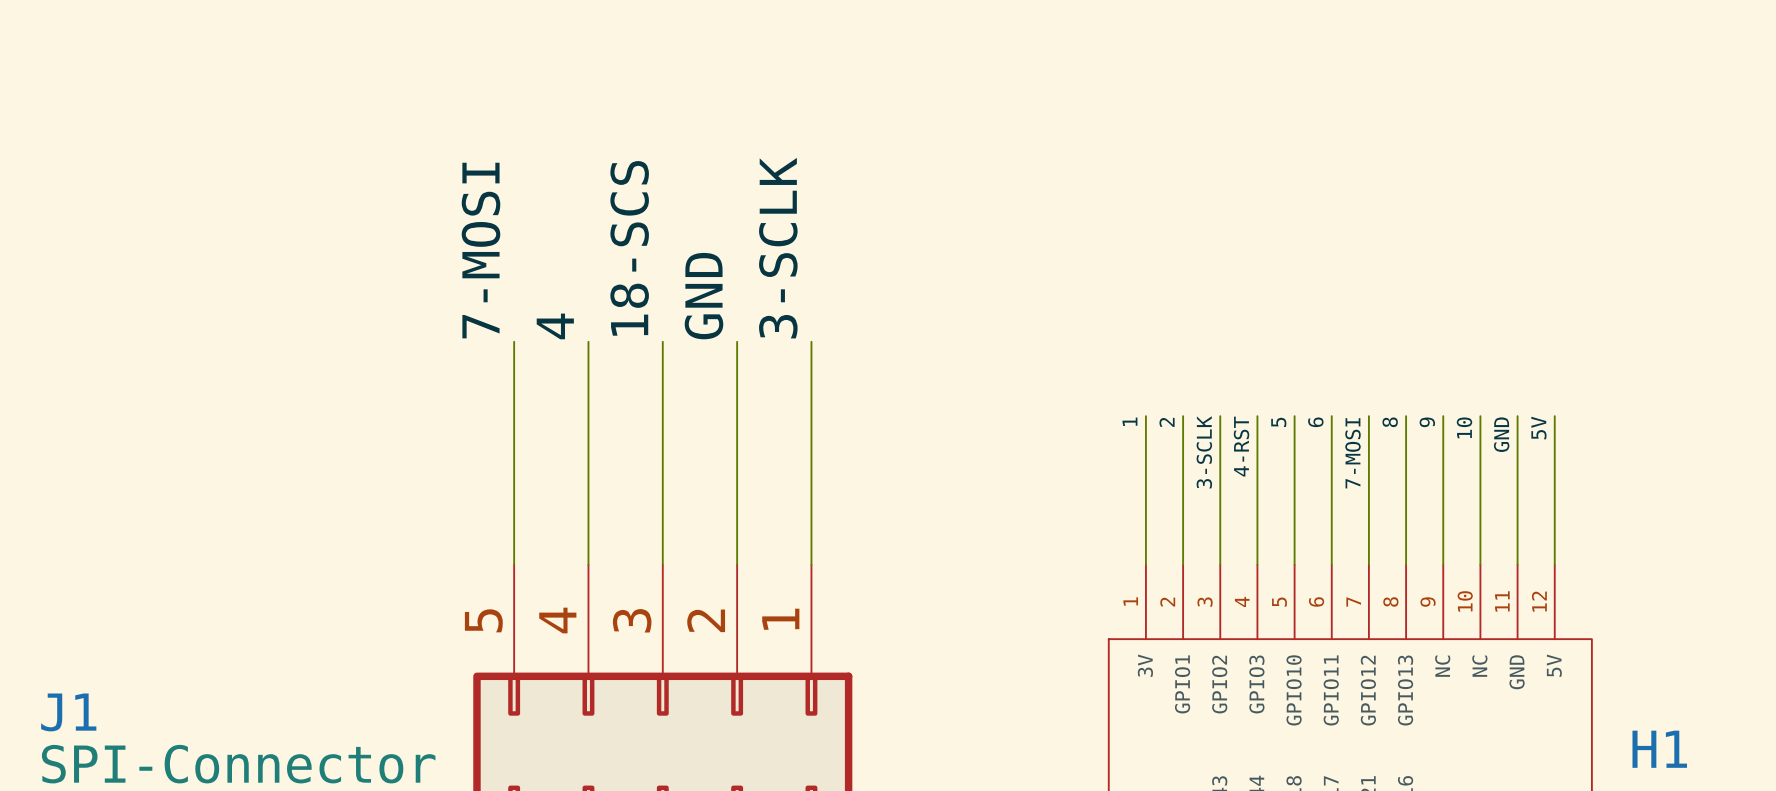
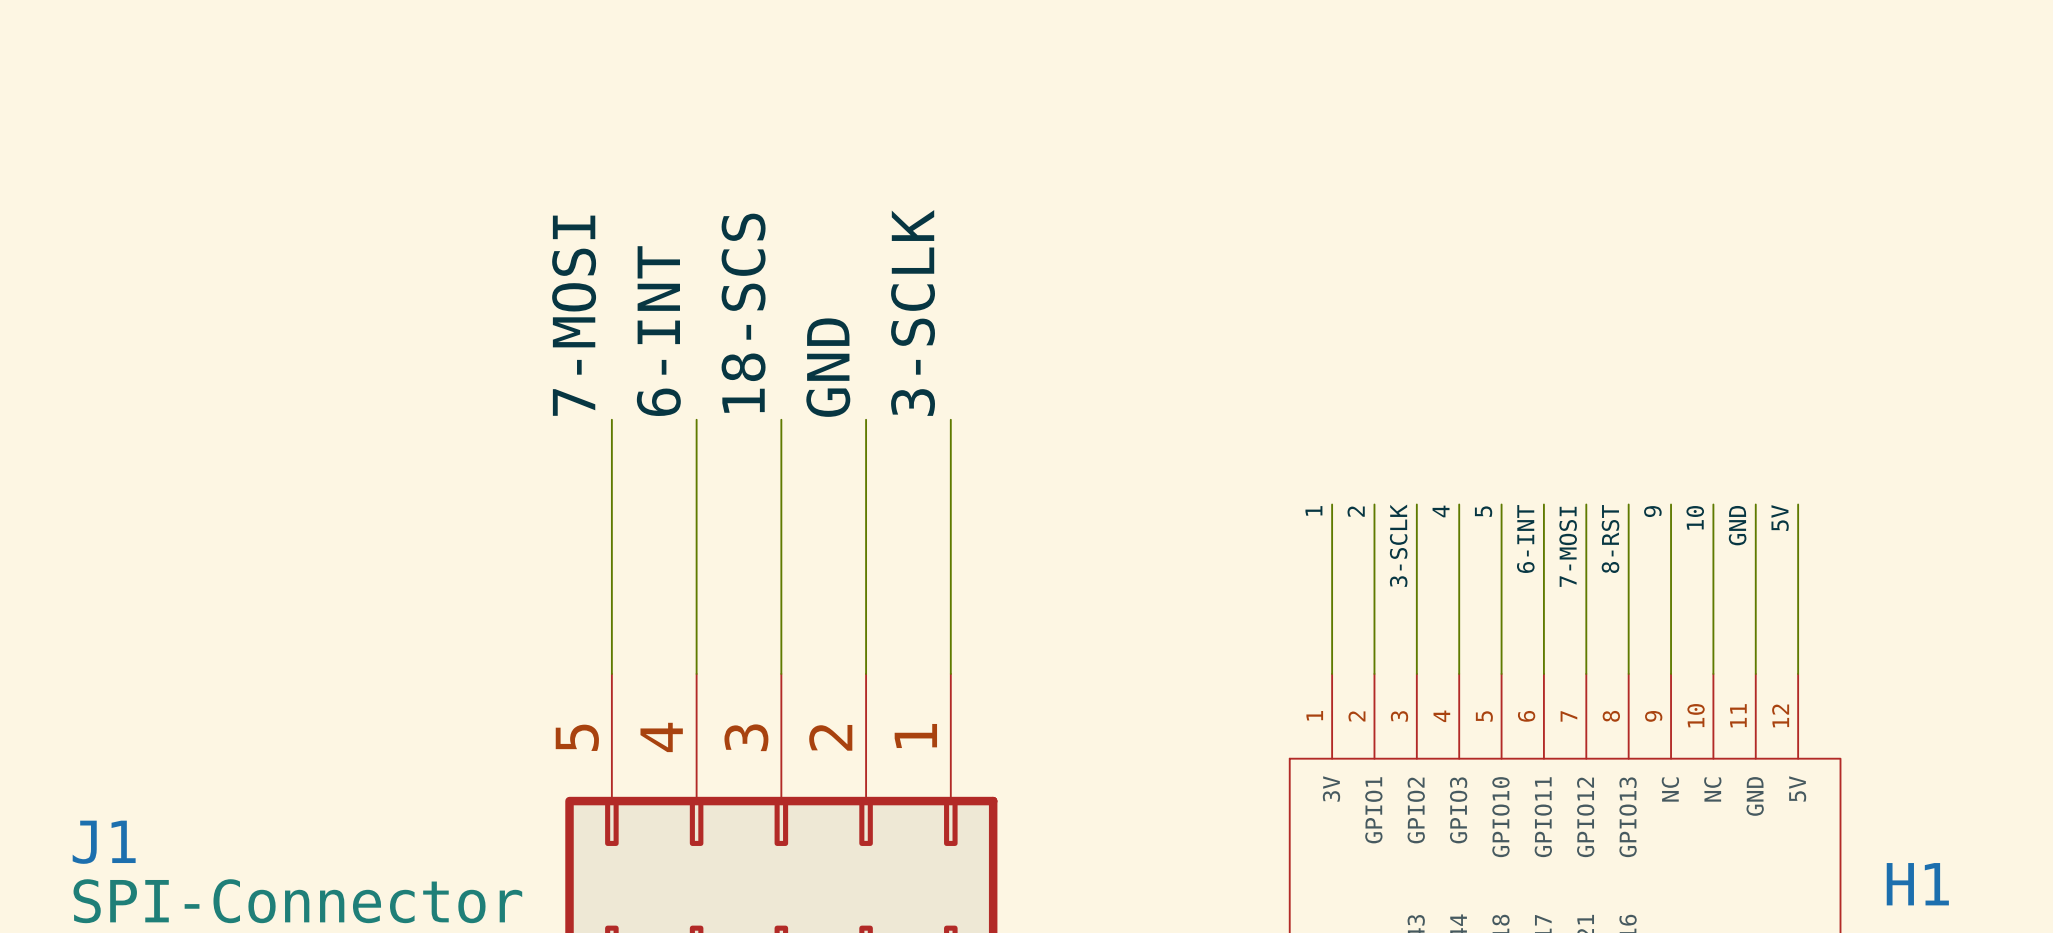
label: 4 (555, 326) -> 6-INT (658, 331)
label: 6 (1315, 422) -> 6-INT (1525, 539)
label: 8 (1390, 422) -> 8-RST (1610, 539)
label: 4-RST (1241, 446) -> 4 (1441, 511)

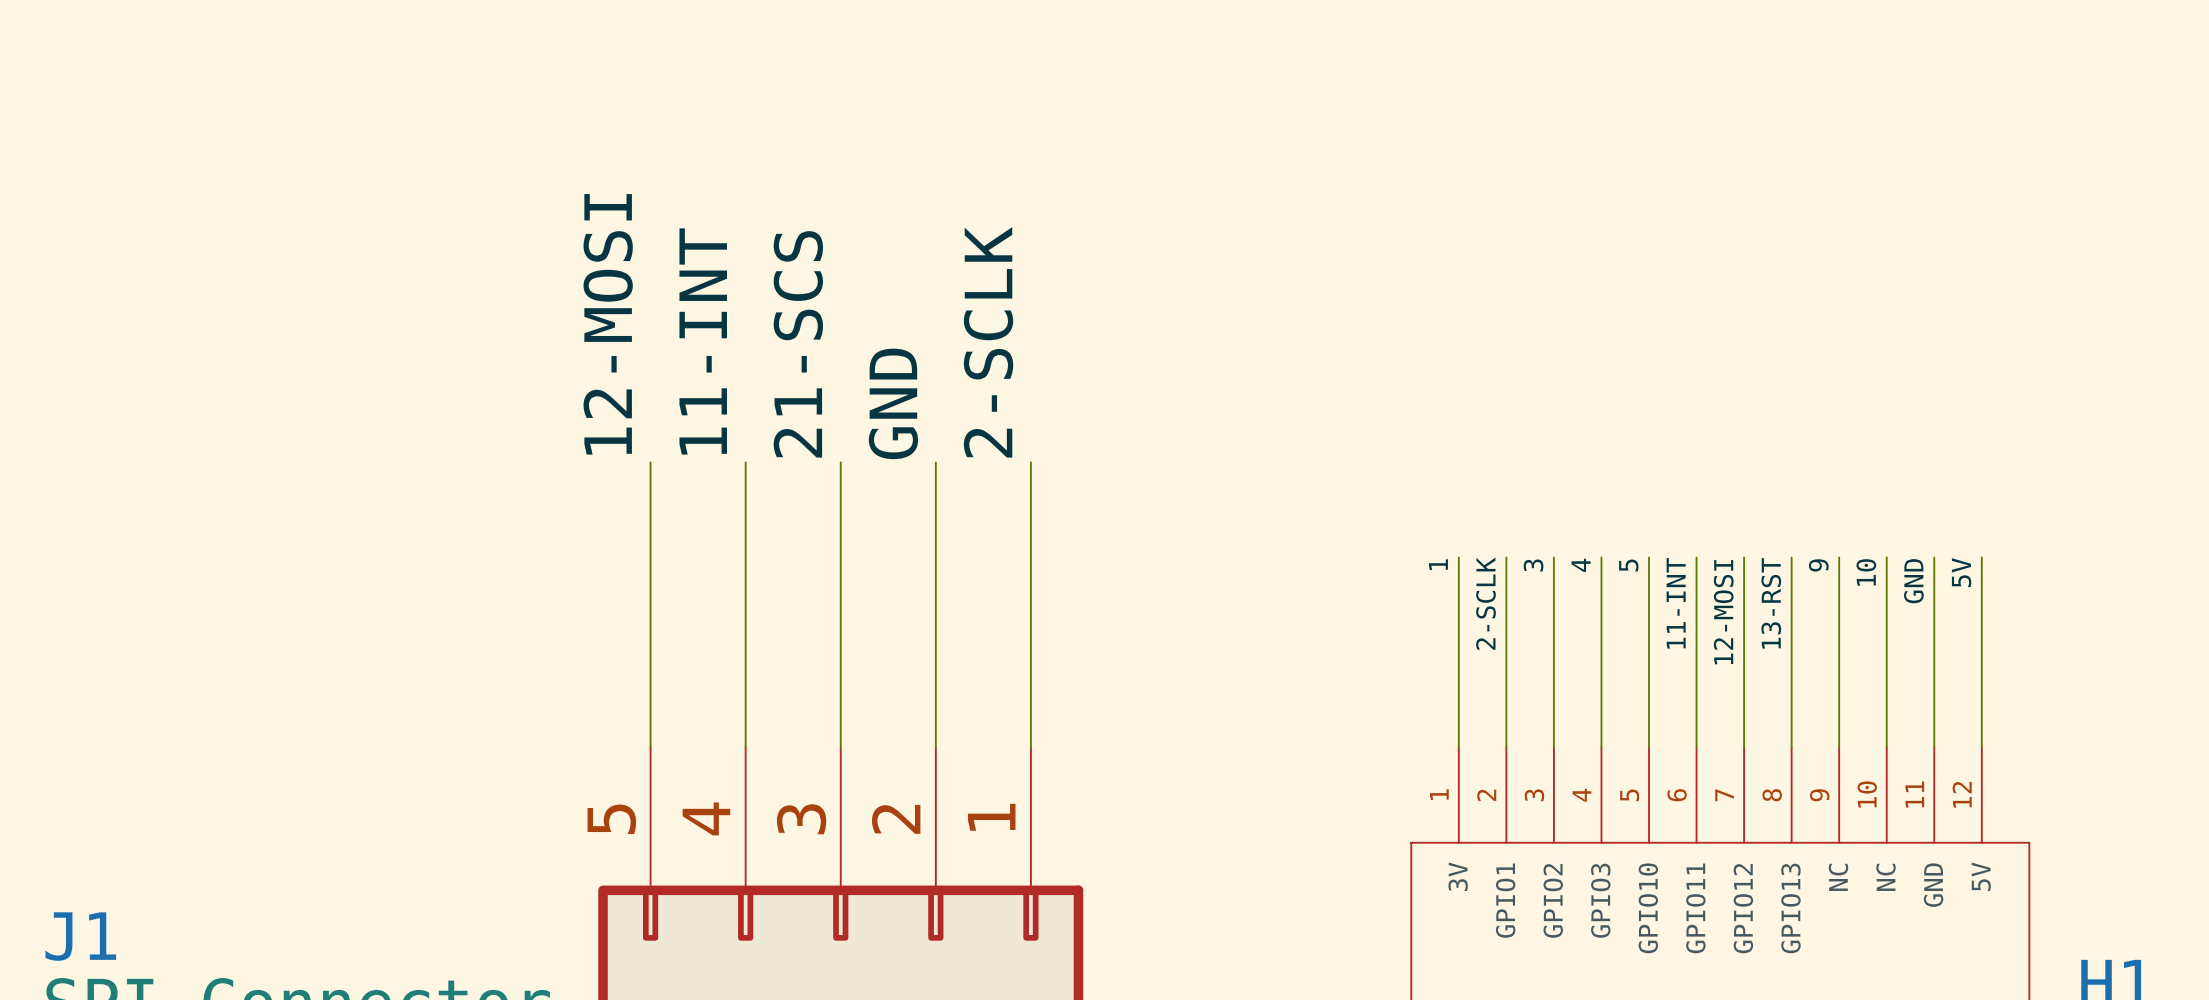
label: 3-SCLK (913, 312) -> 2-SCLK (988, 342)
label: 18-SCS (743, 313) -> 21-SCS (798, 344)
label: 7-MOSI (574, 315) -> 12-MOSI (608, 324)
label: 6-INT (658, 331) -> 11-INT (703, 341)
label: 2 (1356, 511) -> 2-SCLK (1485, 603)
label: 6-INT (1525, 539) -> 11-INT (1676, 603)
label: 8-RST (1610, 539) -> 13-RST (1771, 603)
label: 3-SCLK (1398, 545) -> 3 (1533, 565)
label: 7-MOSI (1568, 546) -> 12-MOSI (1723, 612)

